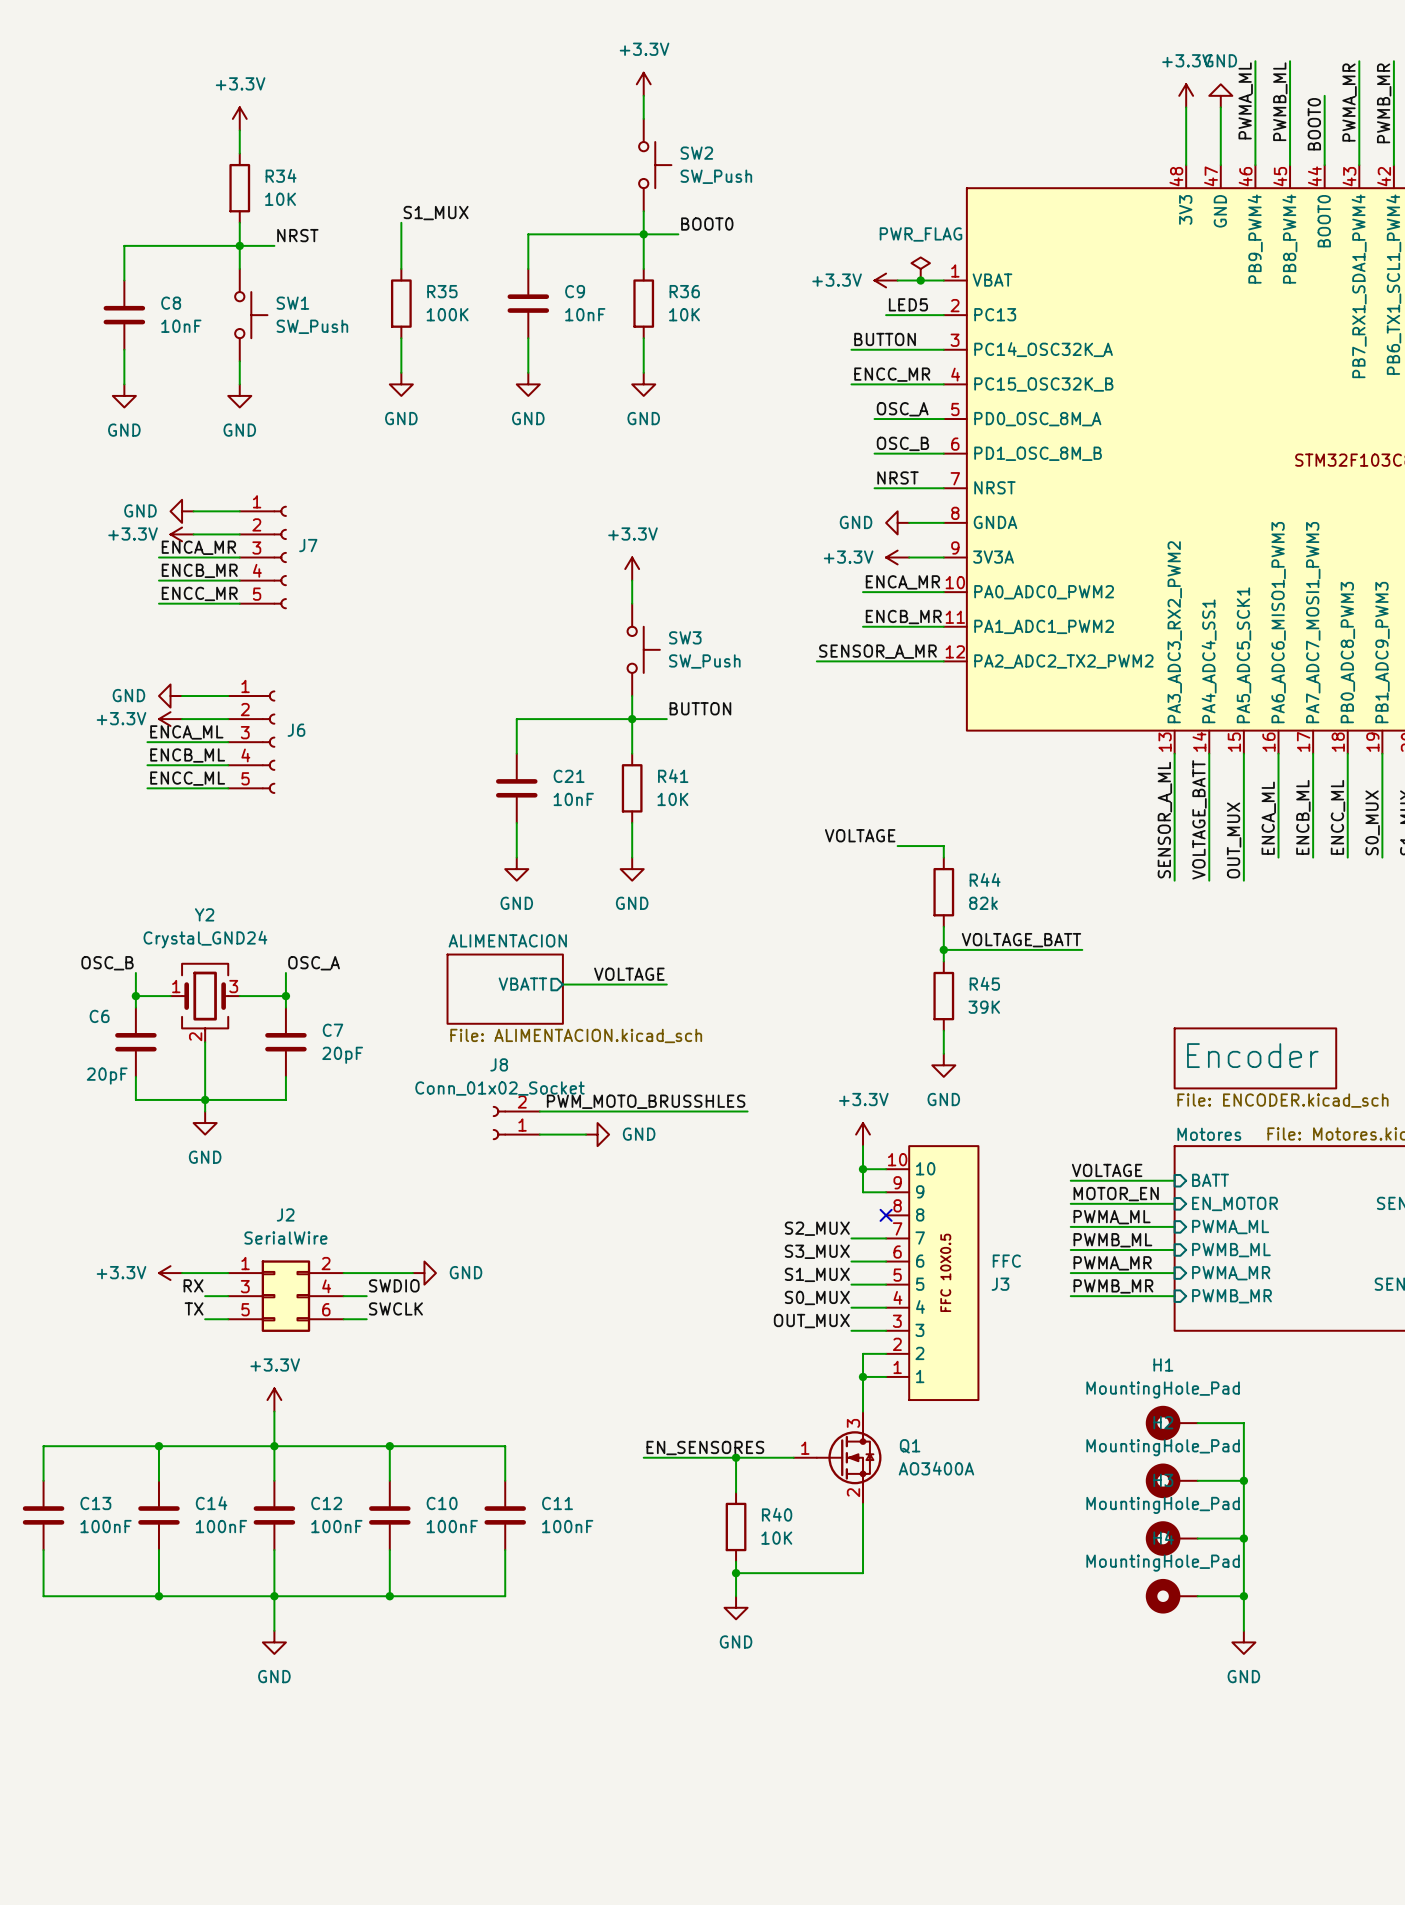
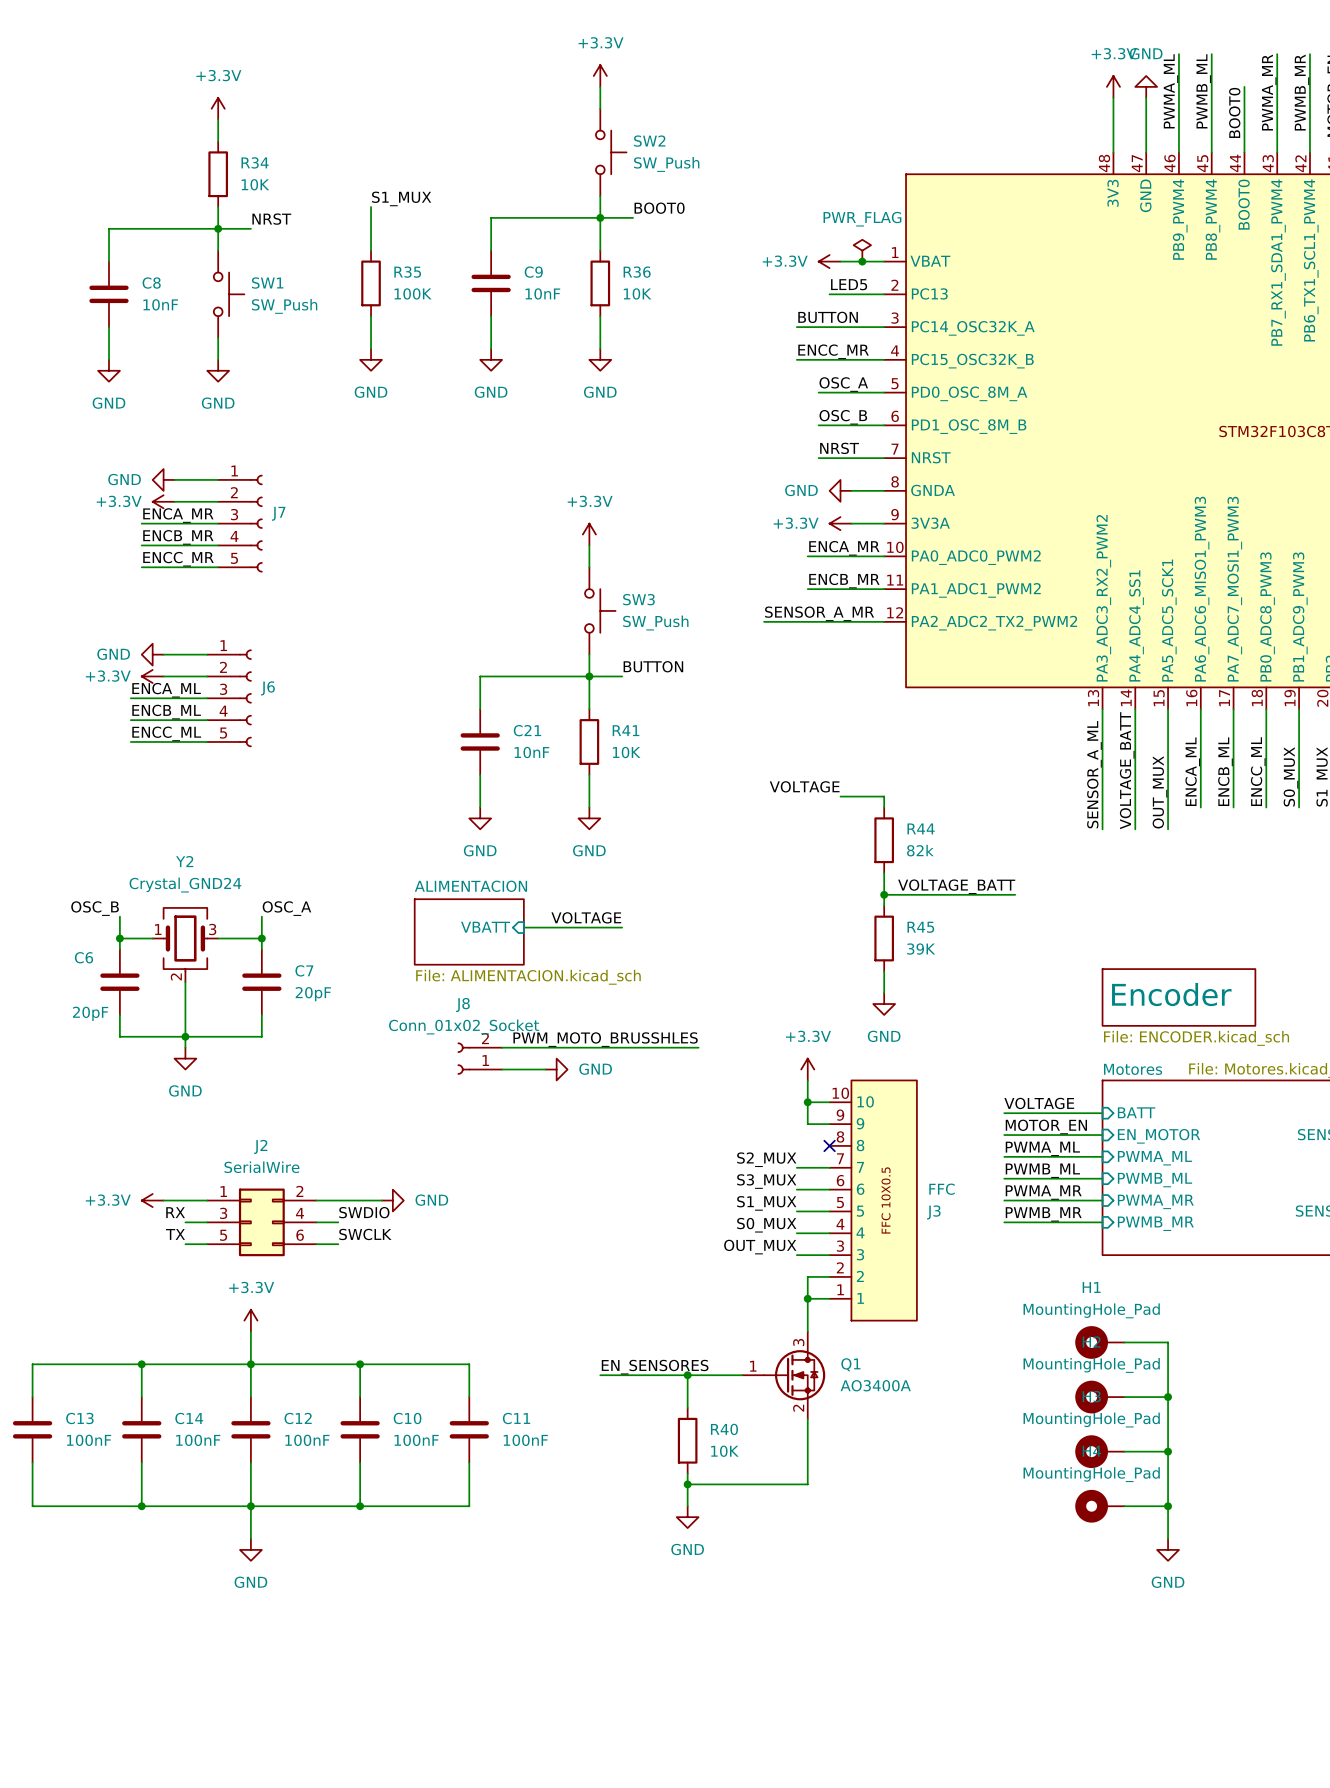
sheet pin shape: output (522, 984) -> input (485, 927)

